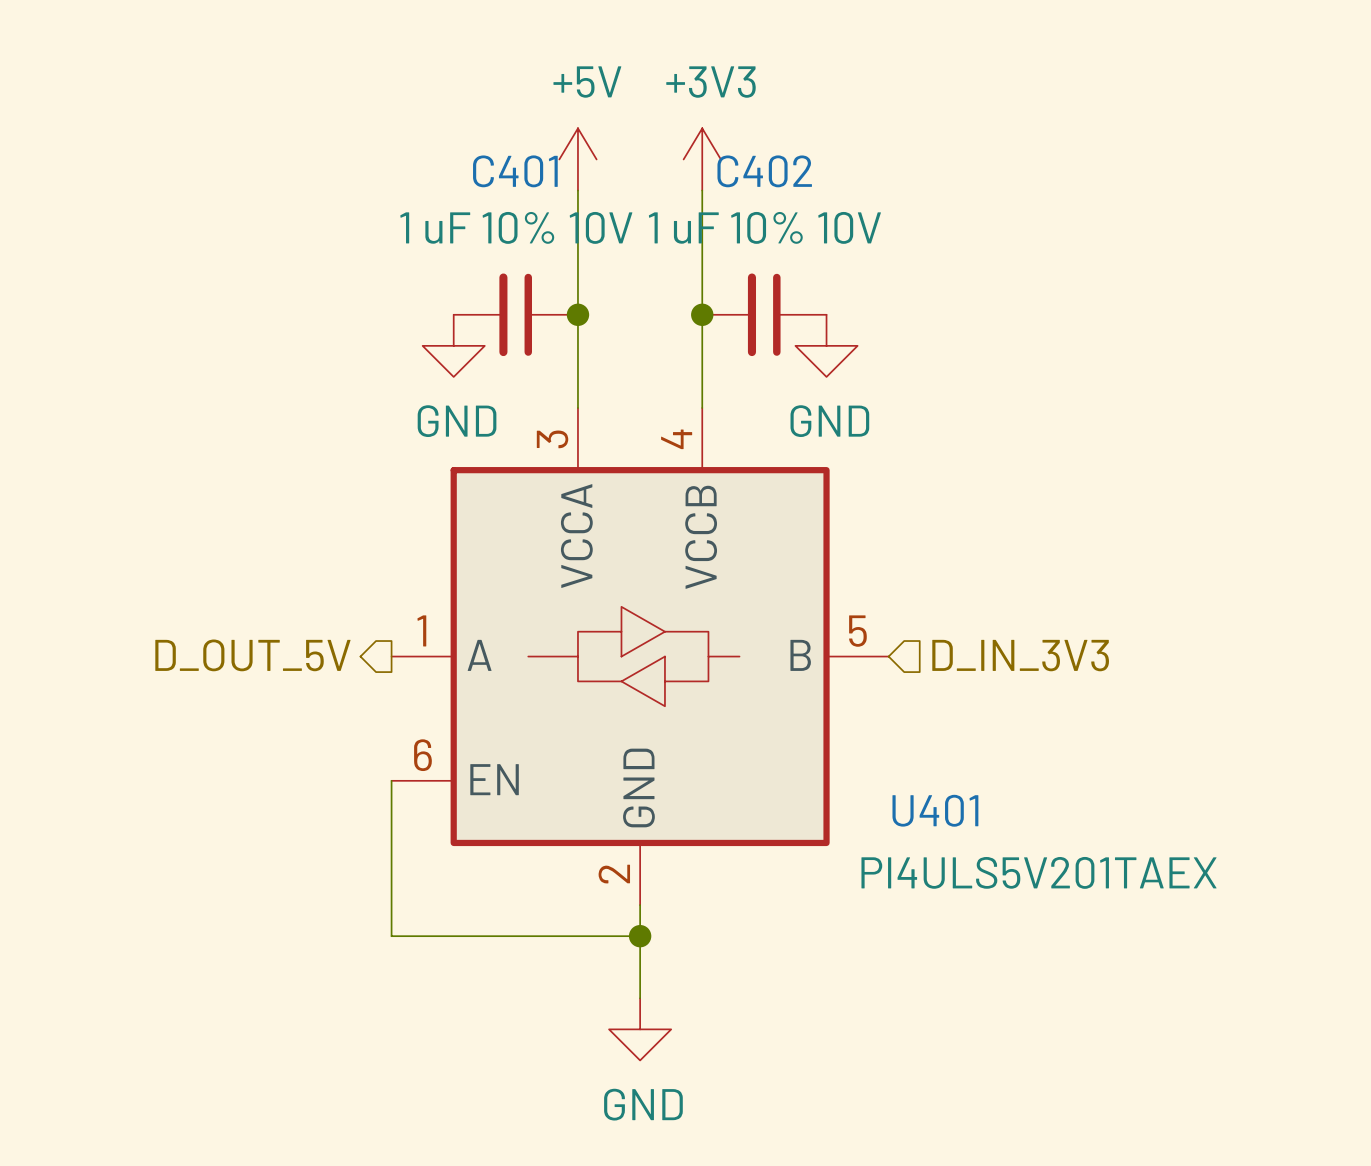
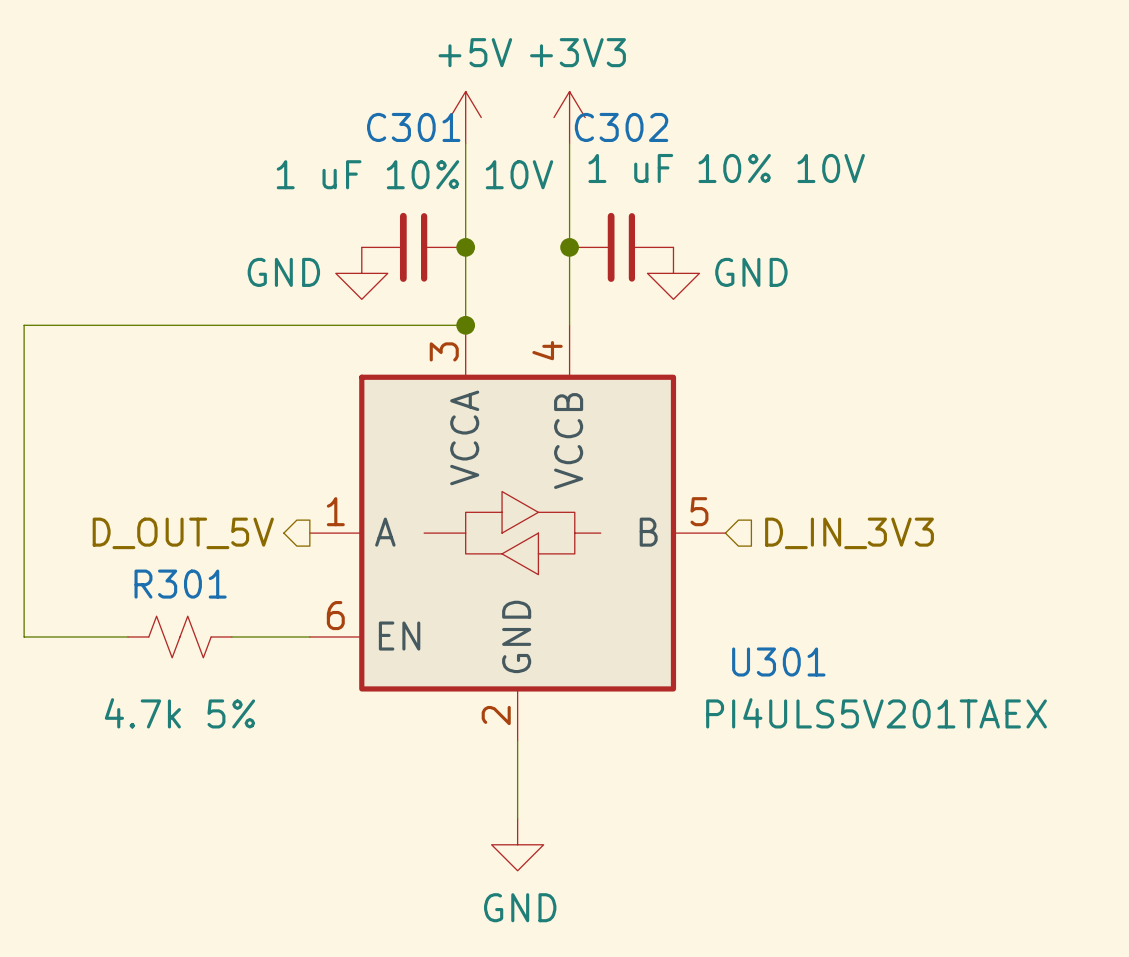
C401 name: C401 (515, 171) -> C301 (413, 127)
C402 name: C402 (764, 171) -> C302 (621, 127)
C402 value position: 1 uF 10% 10V (764, 227) -> 1 uF 10% 10V (726, 168)
wire: none -> (465, 325) (24, 325) (24, 637) (128, 637)
junction: none -> (465, 325)
power symbol text position: GND (457, 421) -> GND (283, 272)
power symbol text position: GND (829, 421) -> GND (751, 272)
R301: none -> 4.7k 5% (179, 637)
wire: (391, 780) (391, 936) (640, 936) -> (309, 637) (231, 637)
U401 name: U401 (935, 810) -> U301 (778, 662)
junction: (640, 936) -> none

